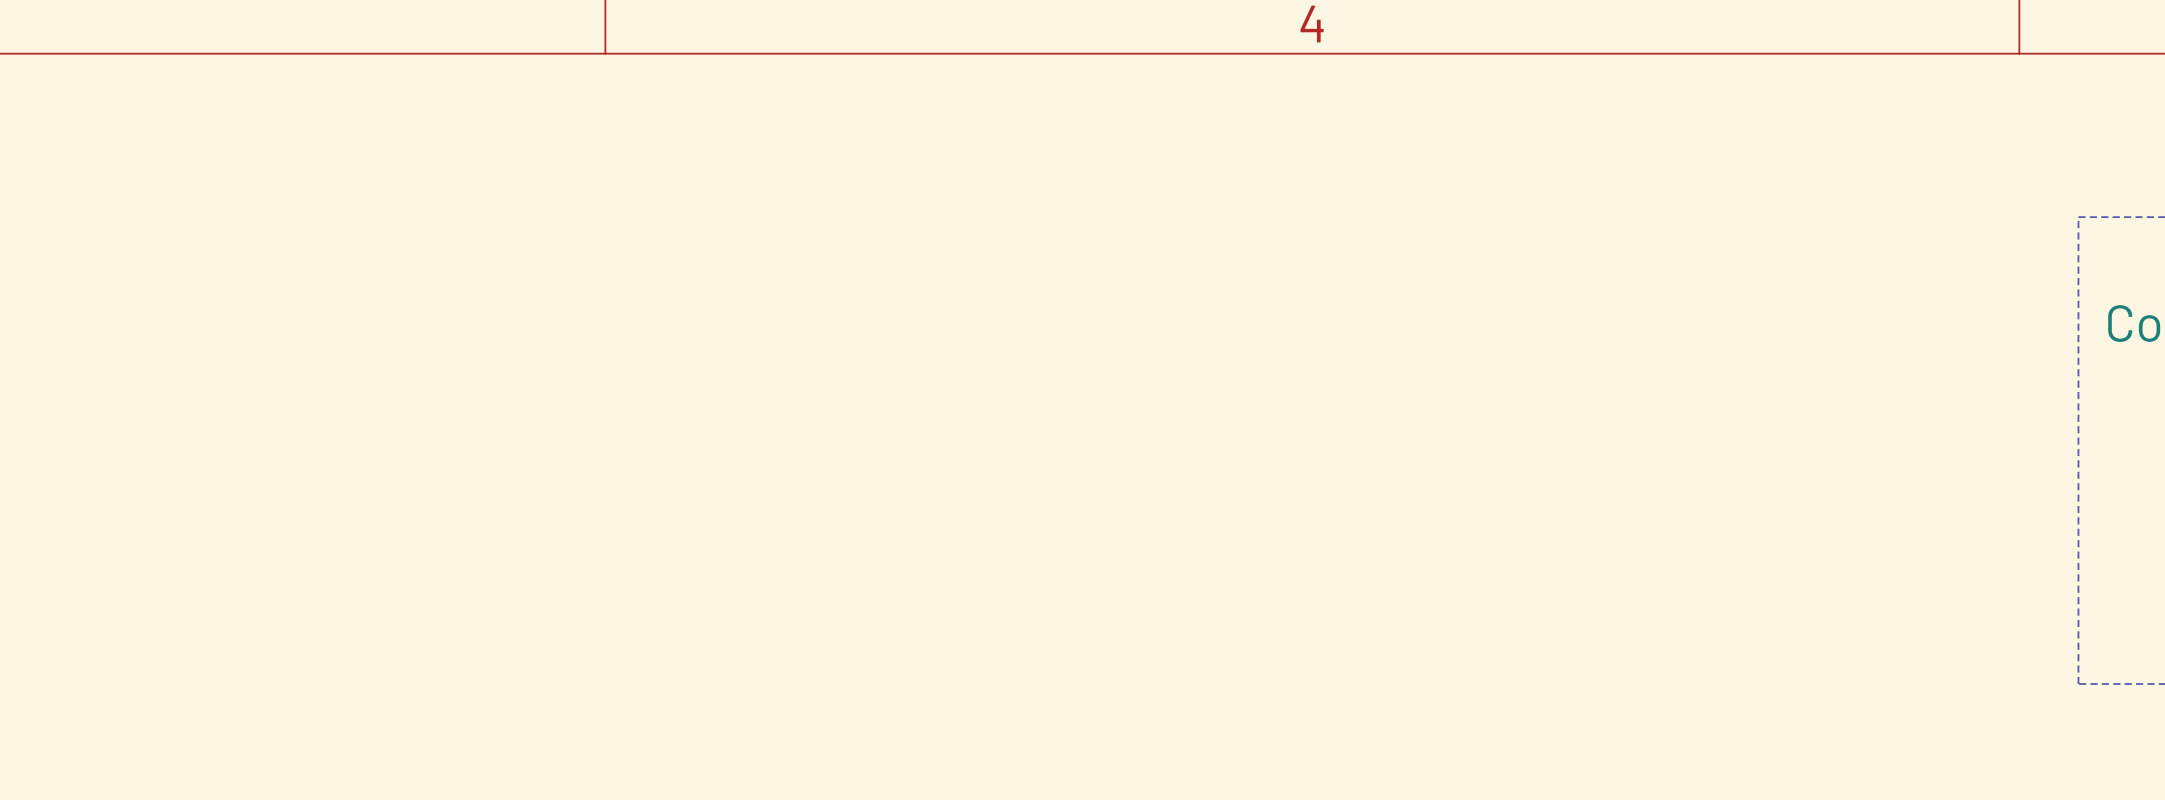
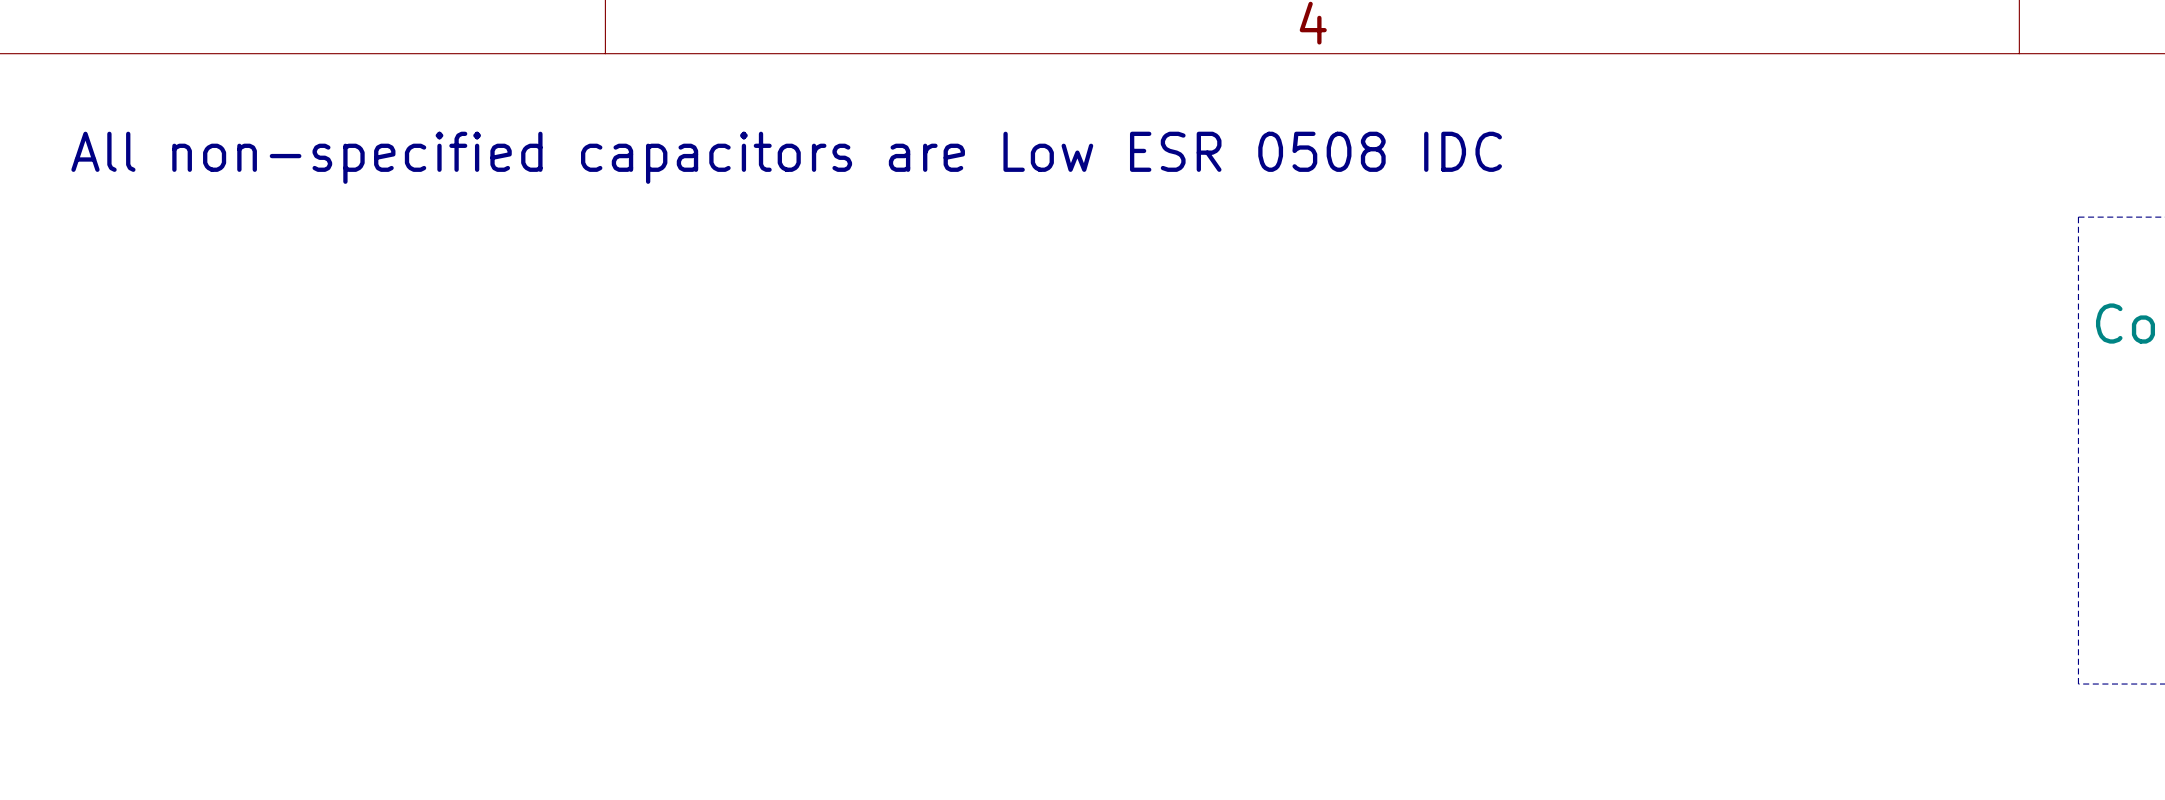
text: none -> All non-specified capacitors are Low ESR 0508 IDC (786, 157)

